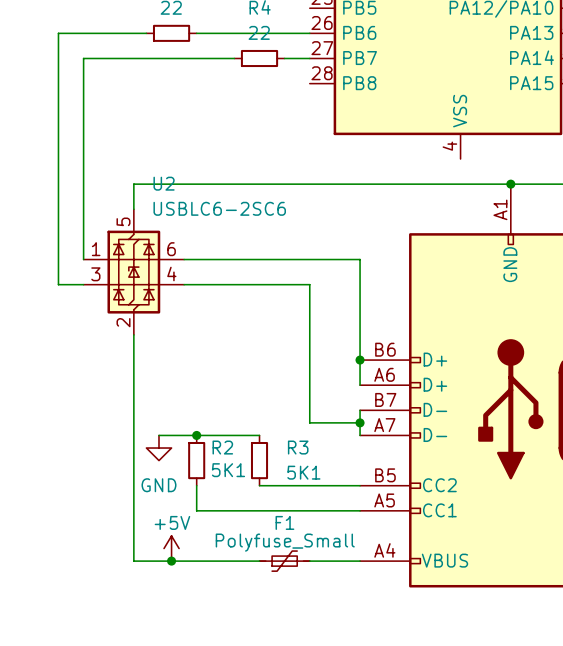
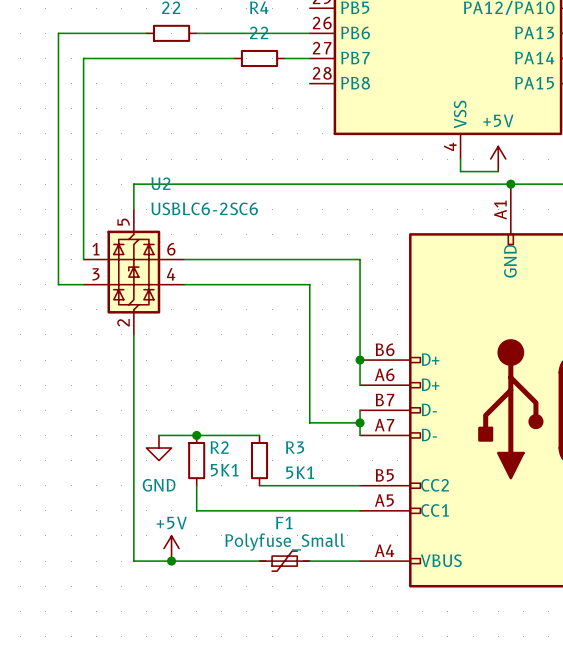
wire: none -> (460, 159) (460, 171) (498, 171)
power symbol: none -> +5V (498, 159)

